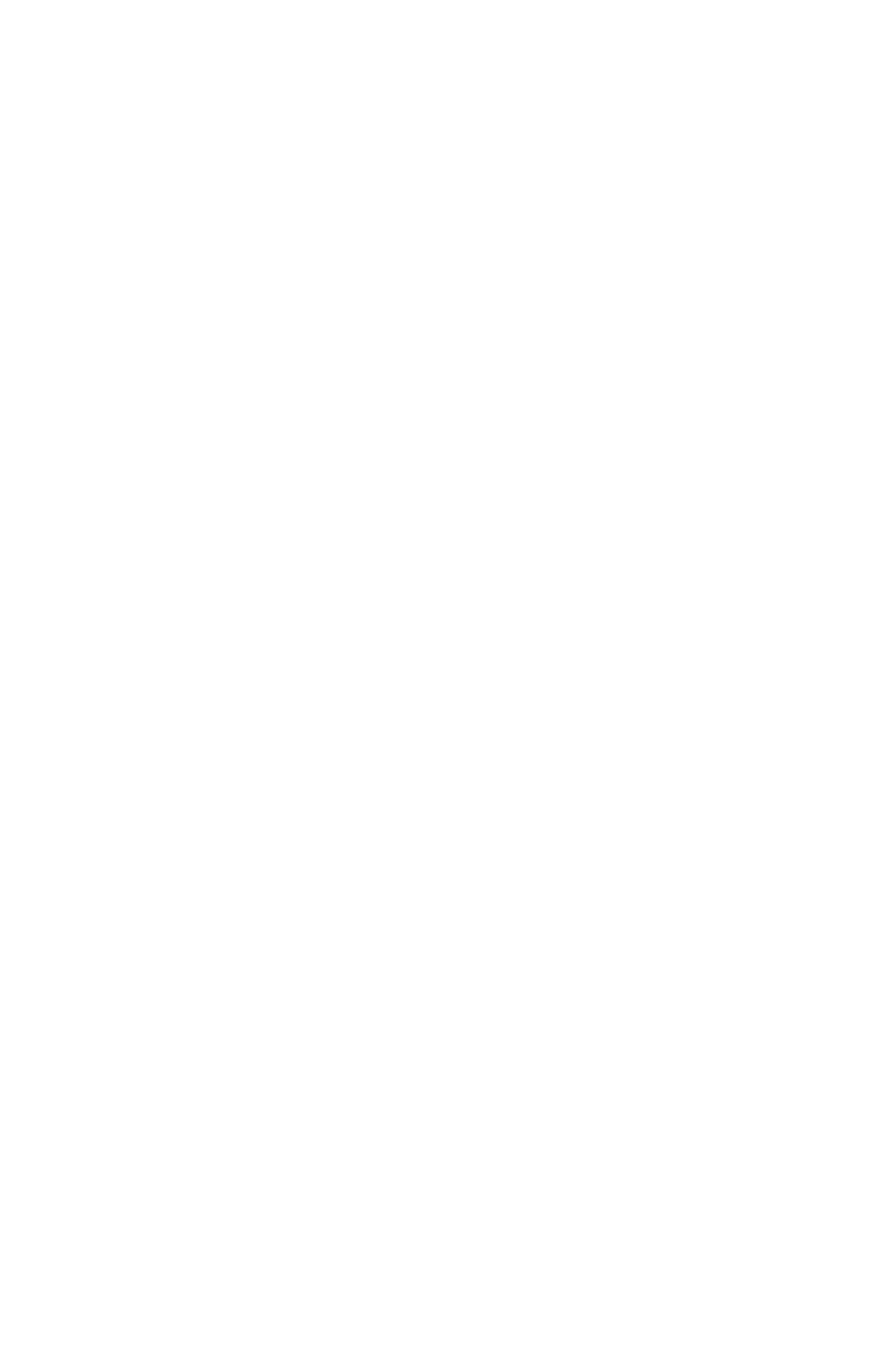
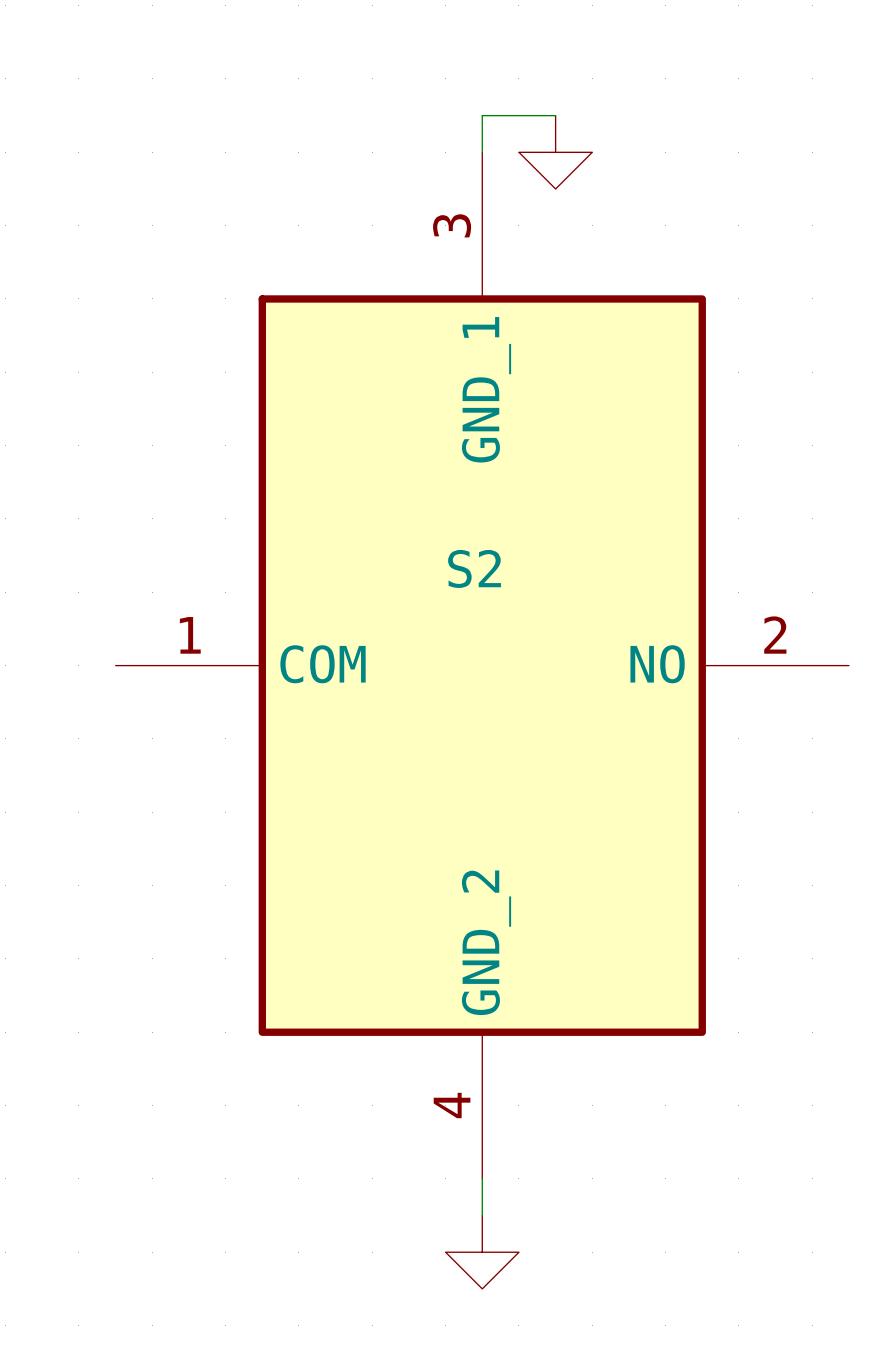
wire: none -> (555, 115) (482, 115) (482, 152)
power symbol: none -> (555, 152)
S2: none -> (482, 665)
wire: none -> (482, 1178) (482, 1215)
power symbol: none -> (482, 1252)

